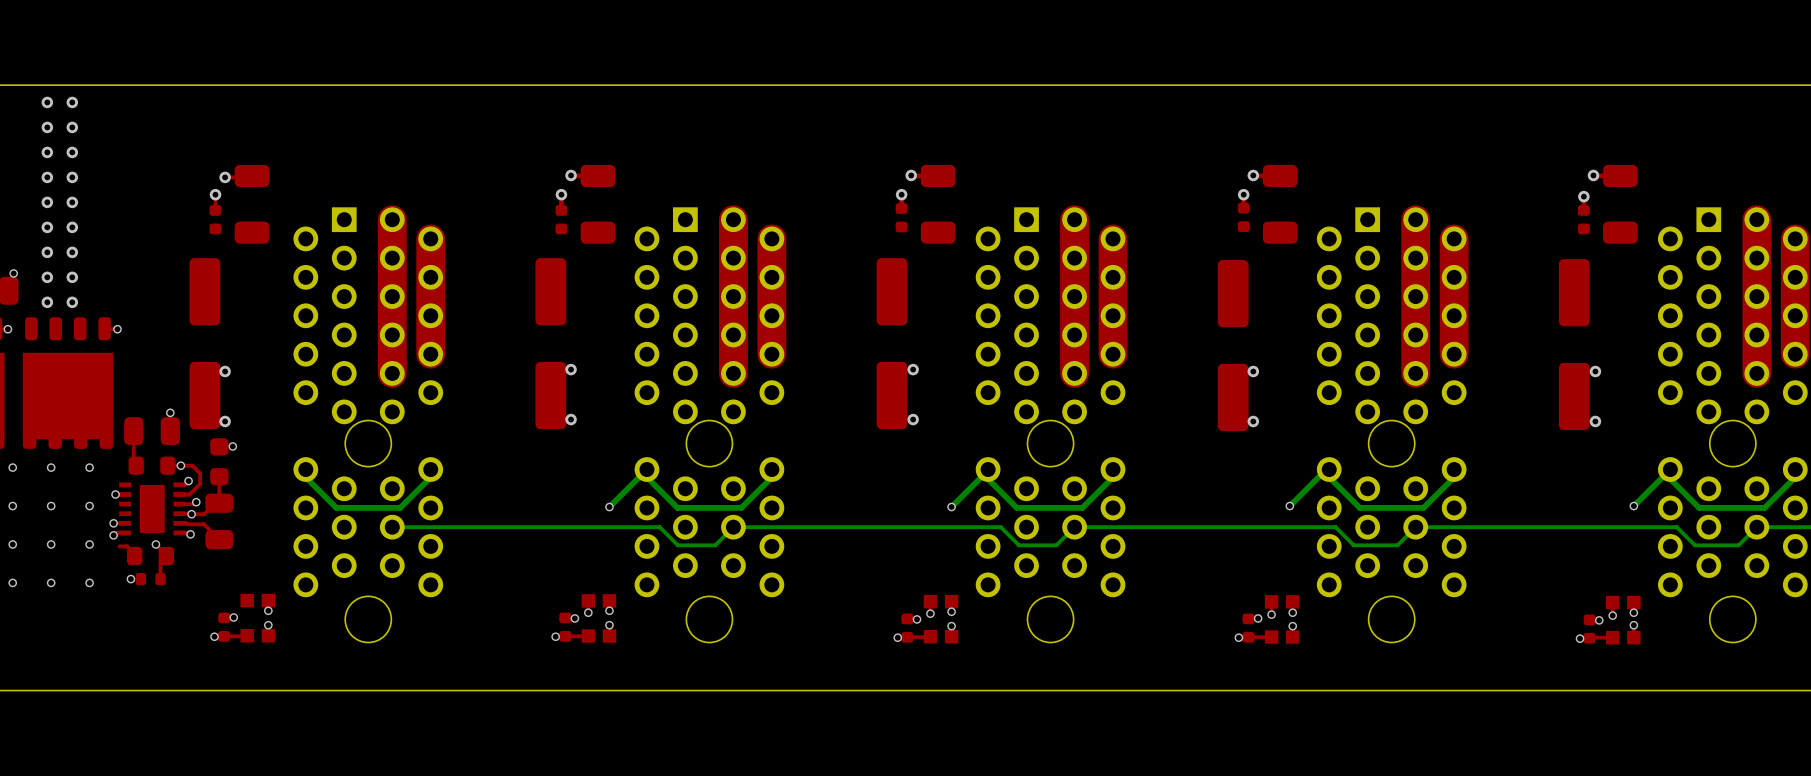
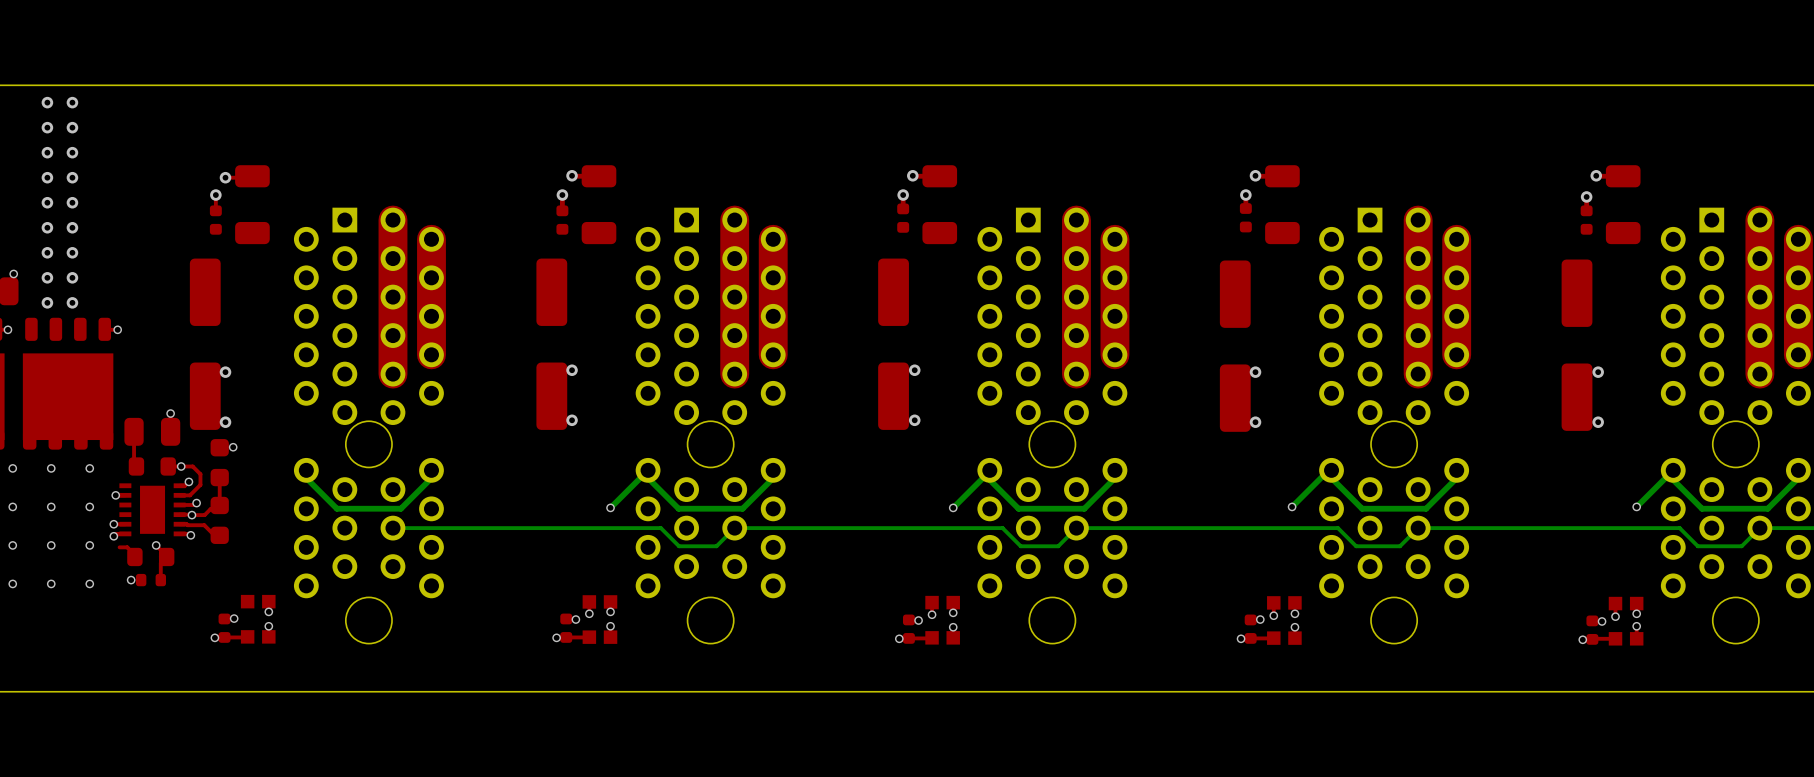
part footprint: [205, 493, 234, 550] -> [210, 496, 229, 544]

